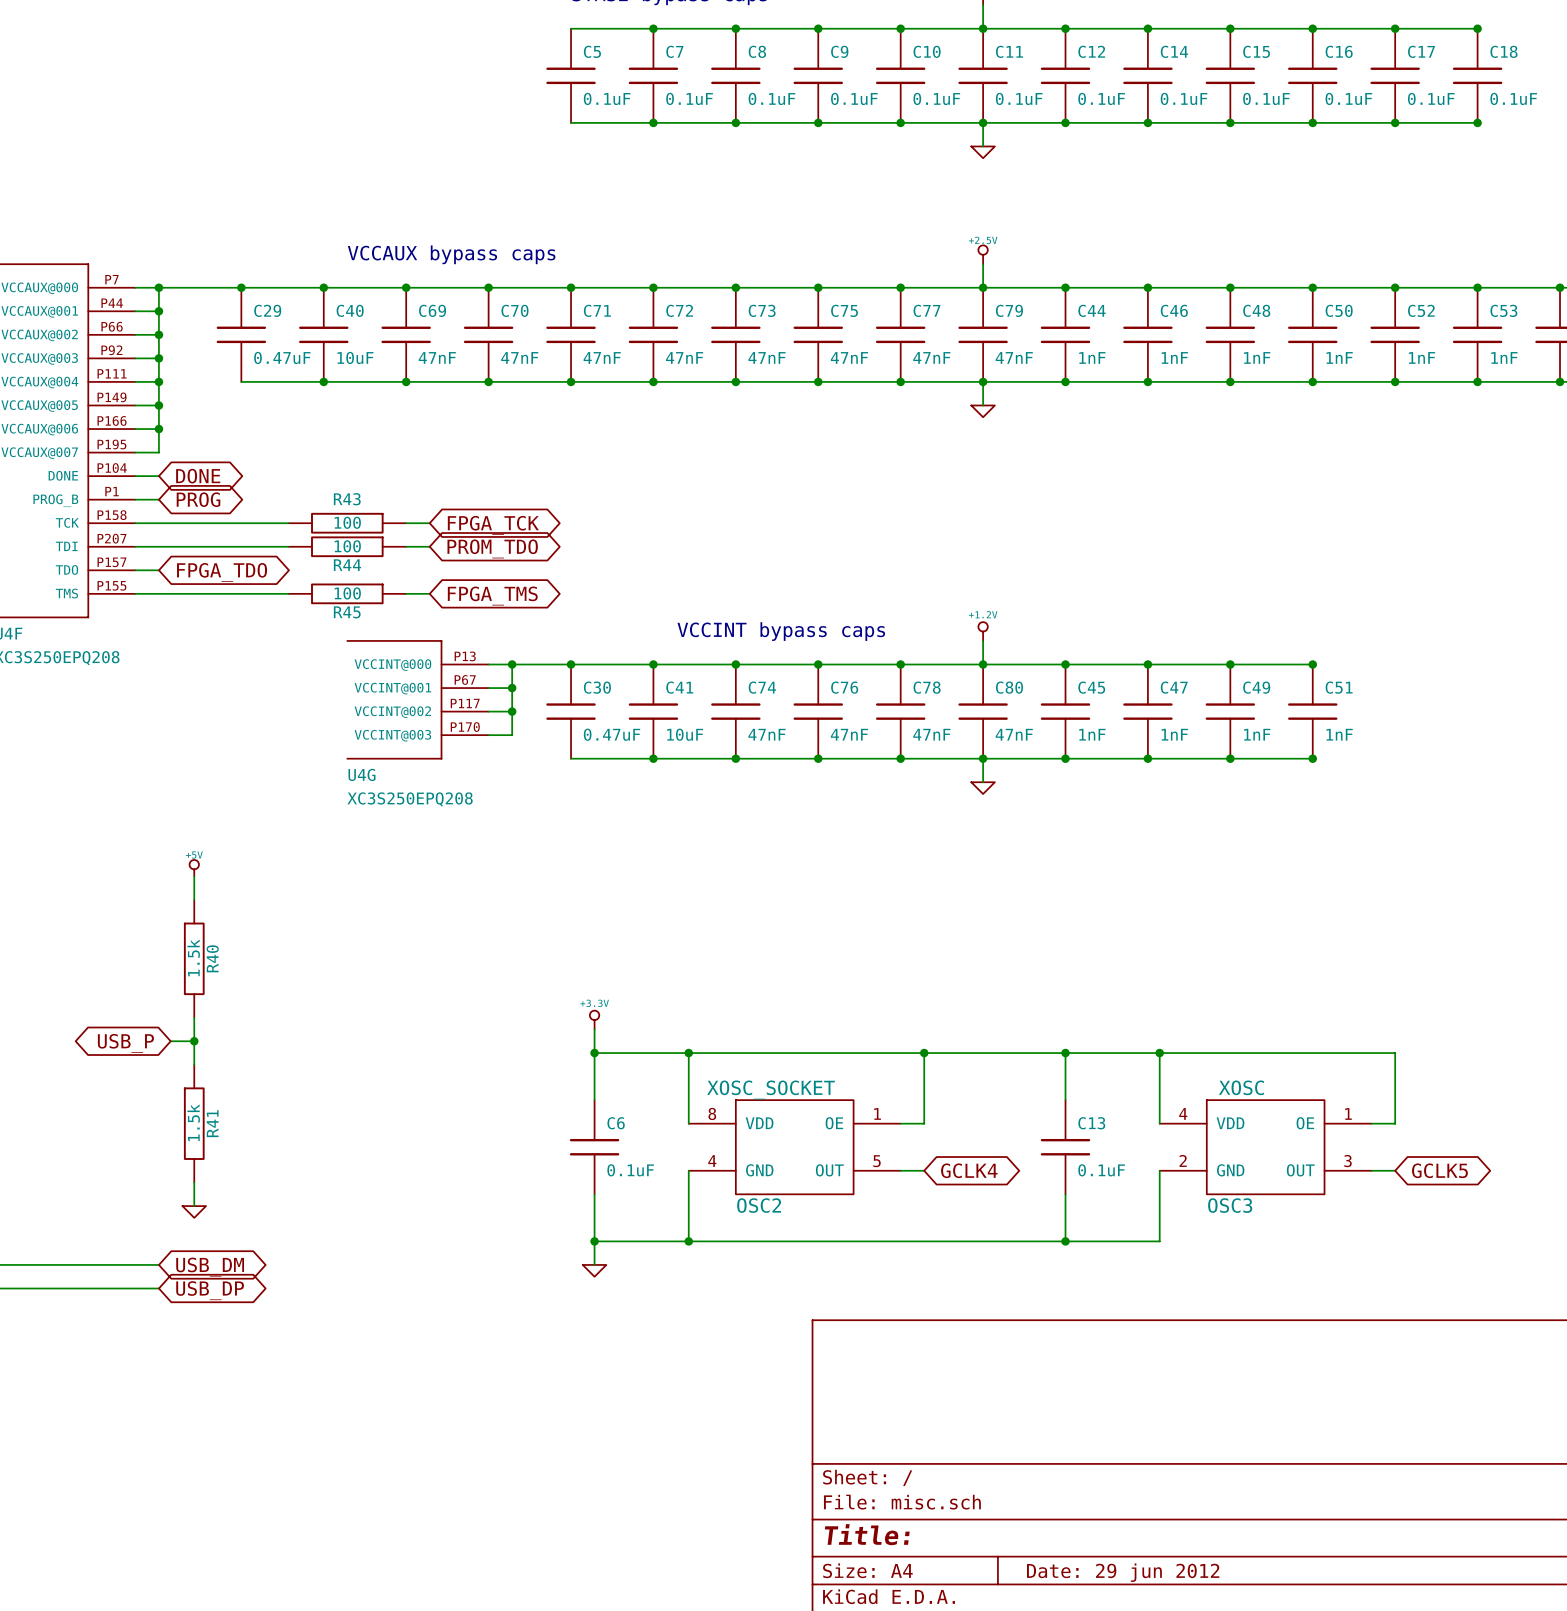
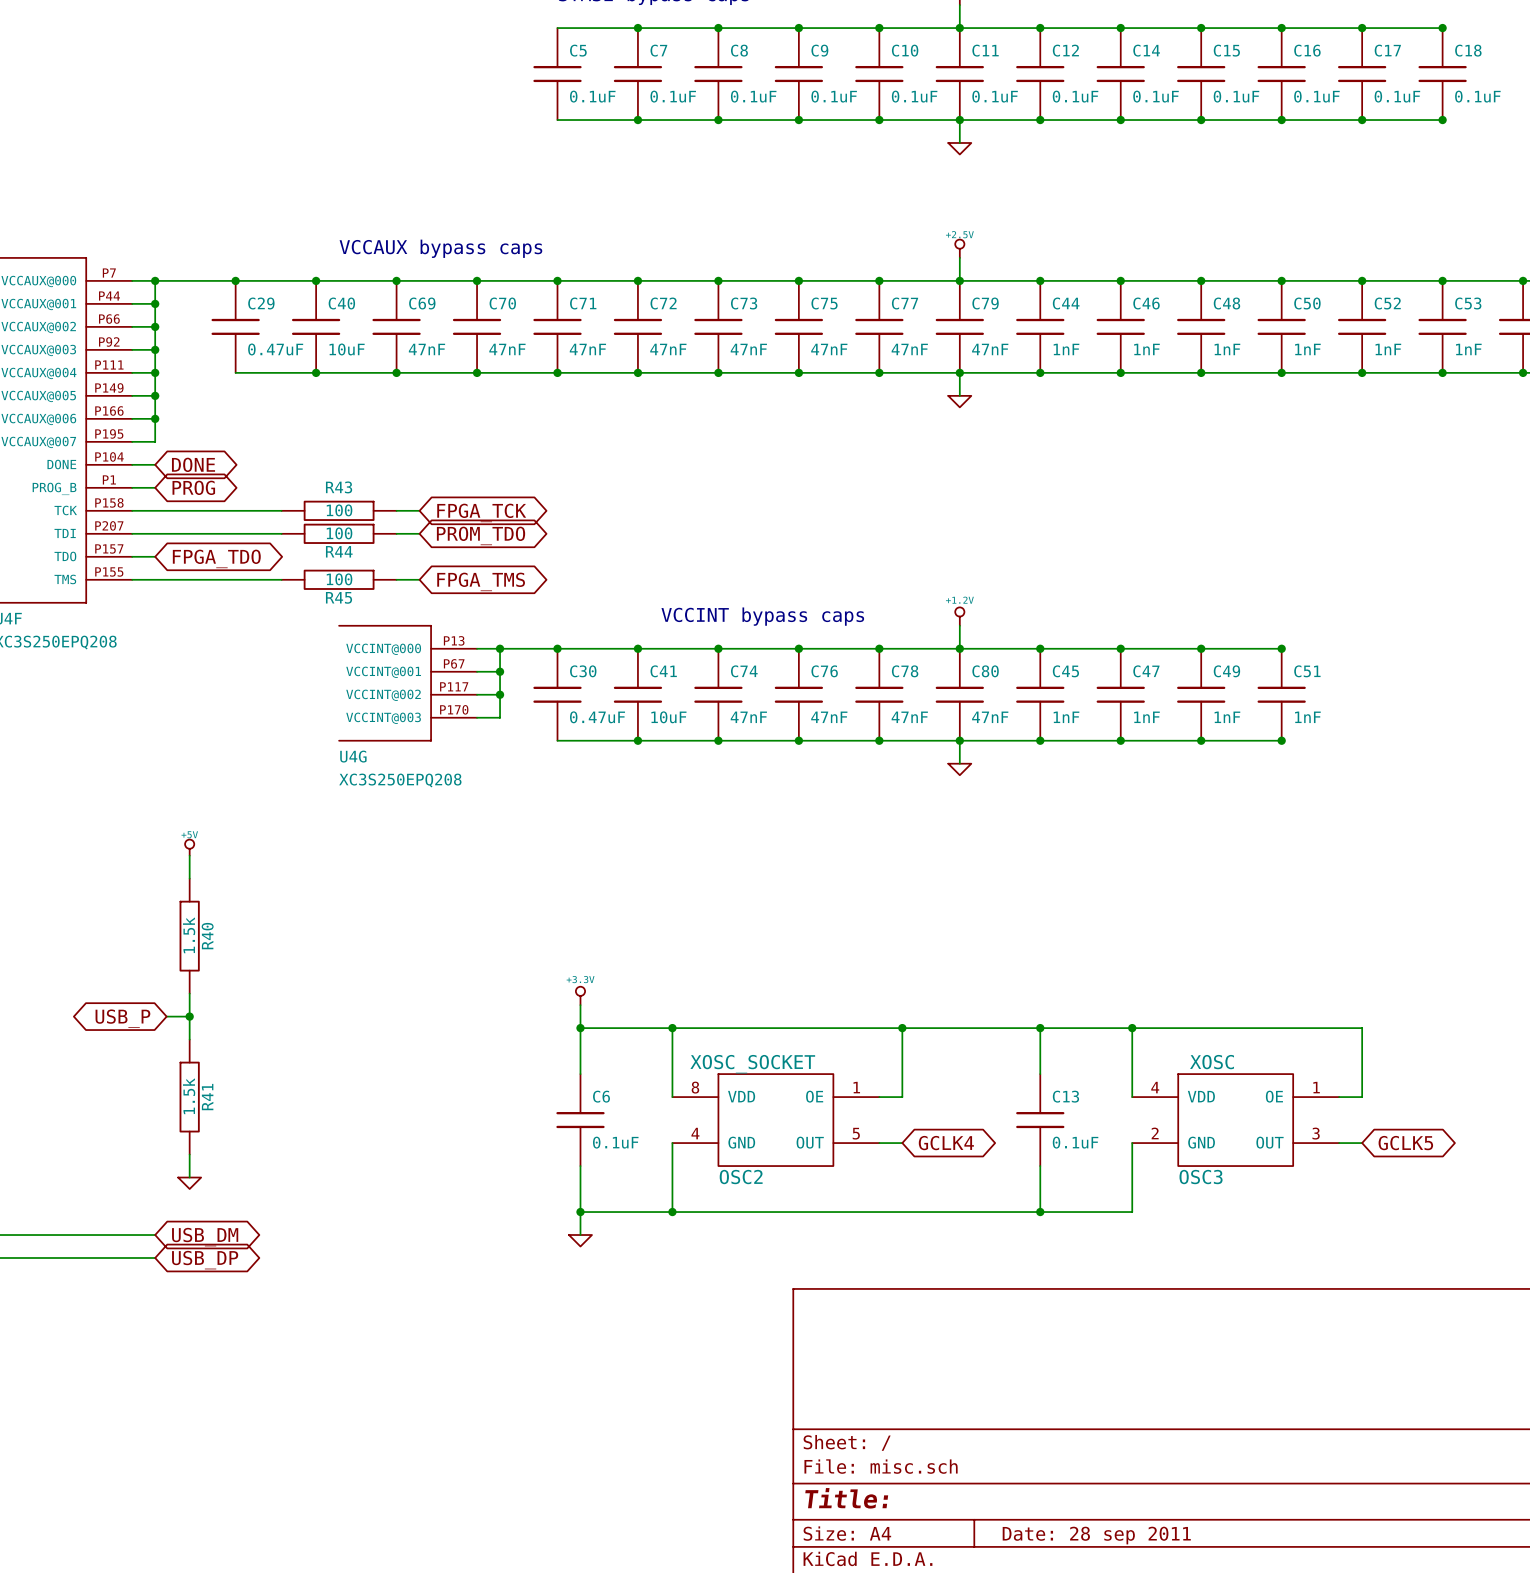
title block: Date: 29 jun 2012 (1123, 1572) -> Date: 28 sep 2011 (1096, 1535)

